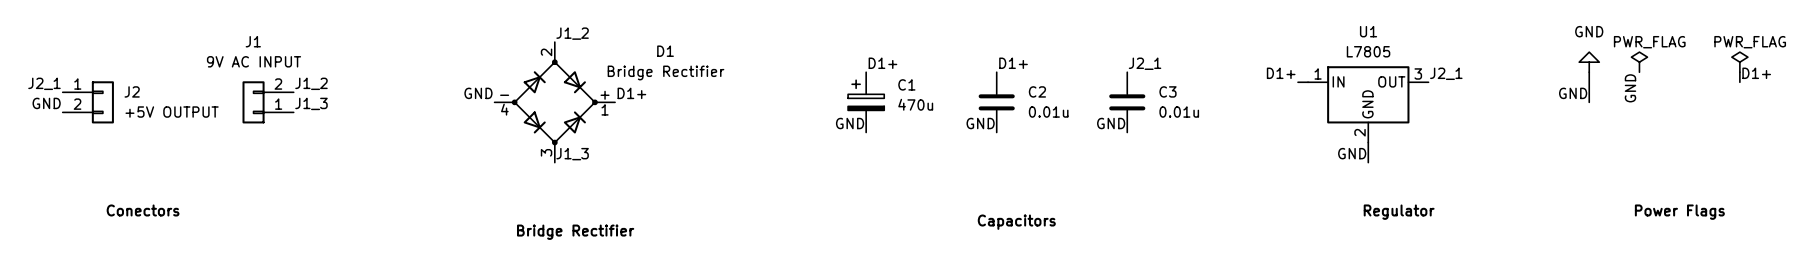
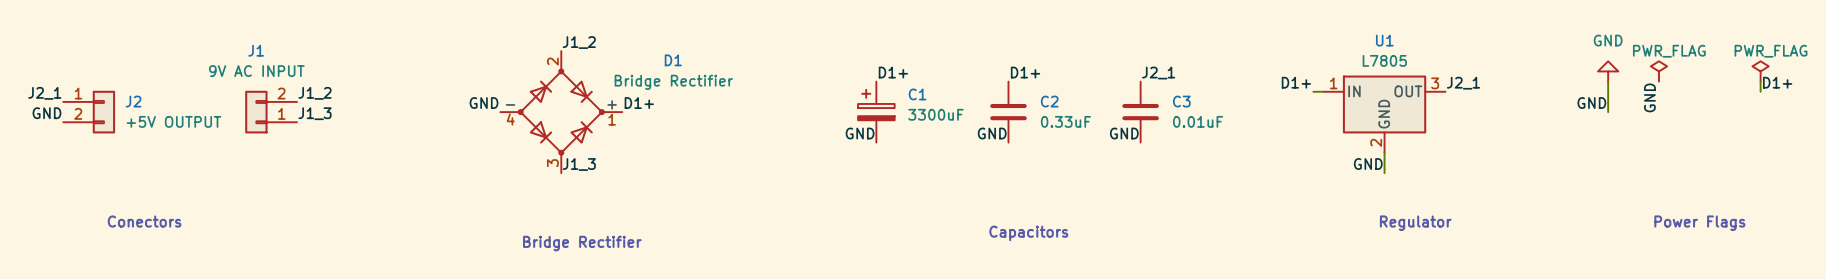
C1 value: 470u (915, 104) -> 3300uF (935, 114)
C2 value: 0.01u (1048, 112) -> 0.33uF (1065, 121)
C3 value: 0.01u (1179, 112) -> 0.01uF (1198, 121)

